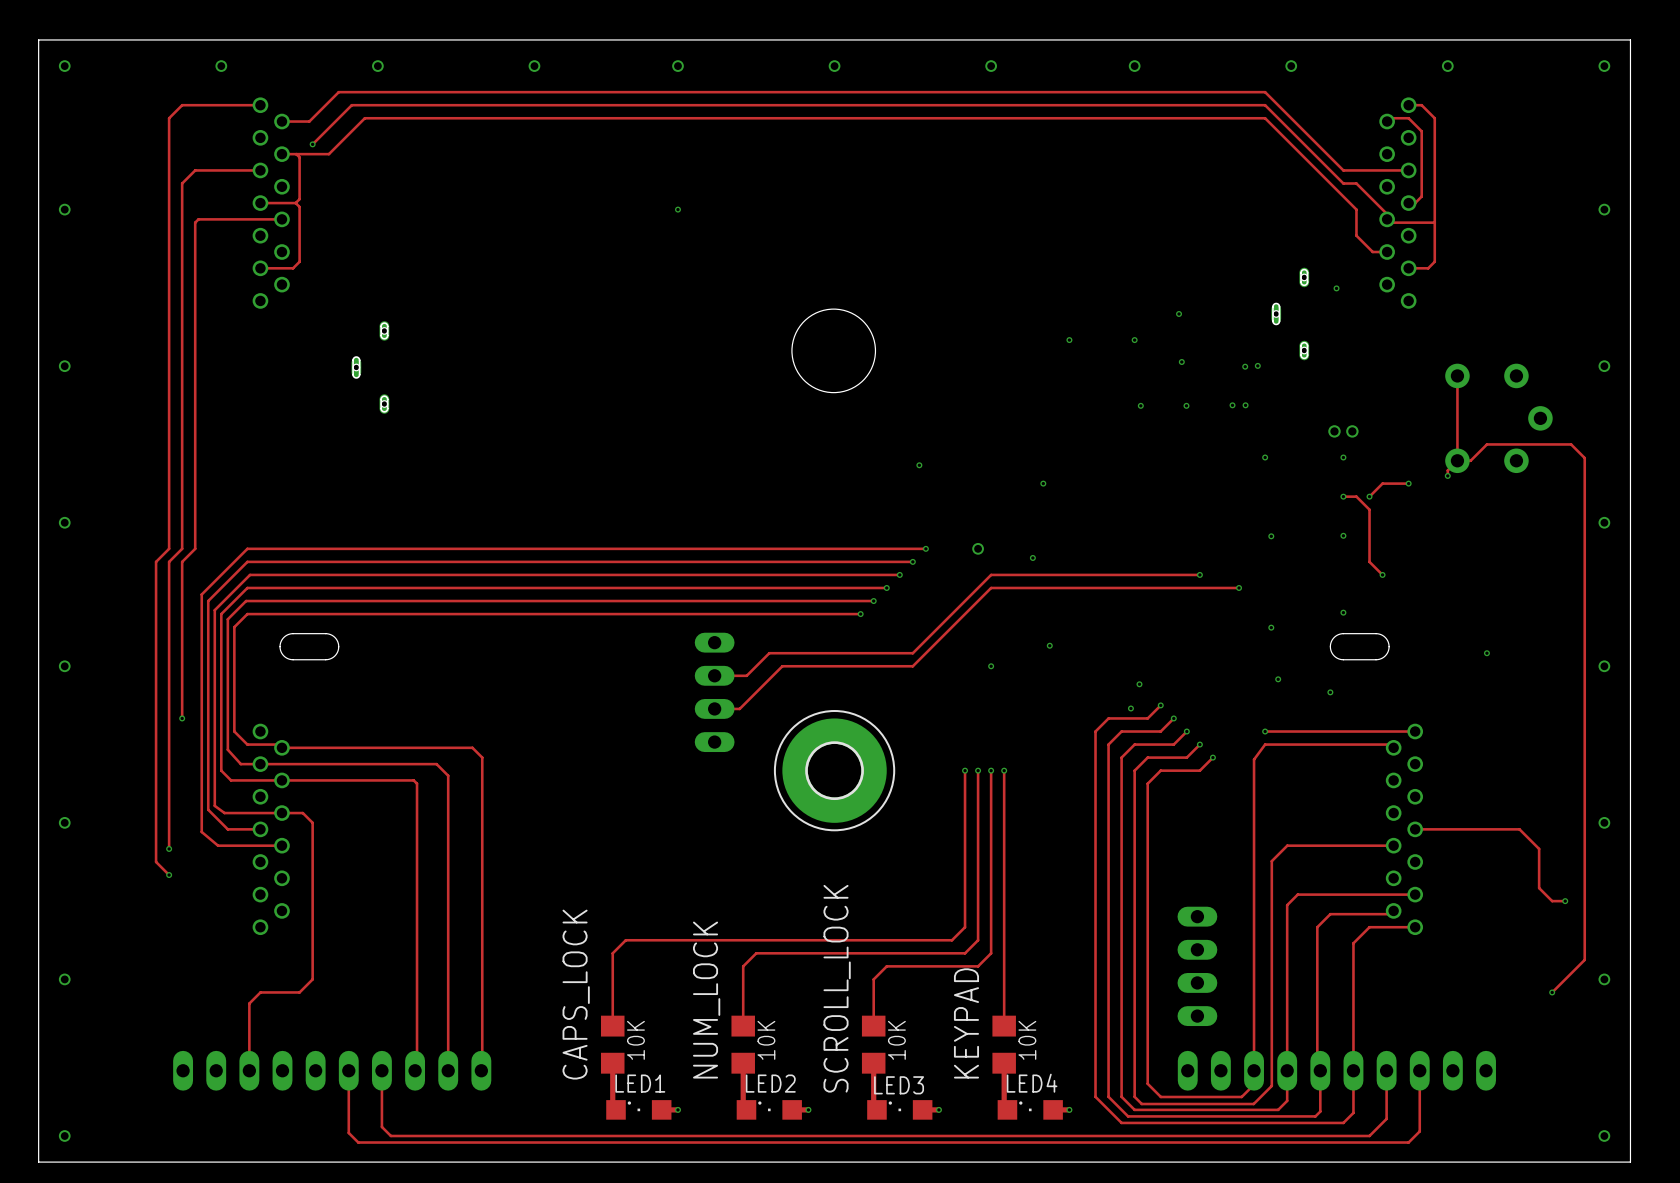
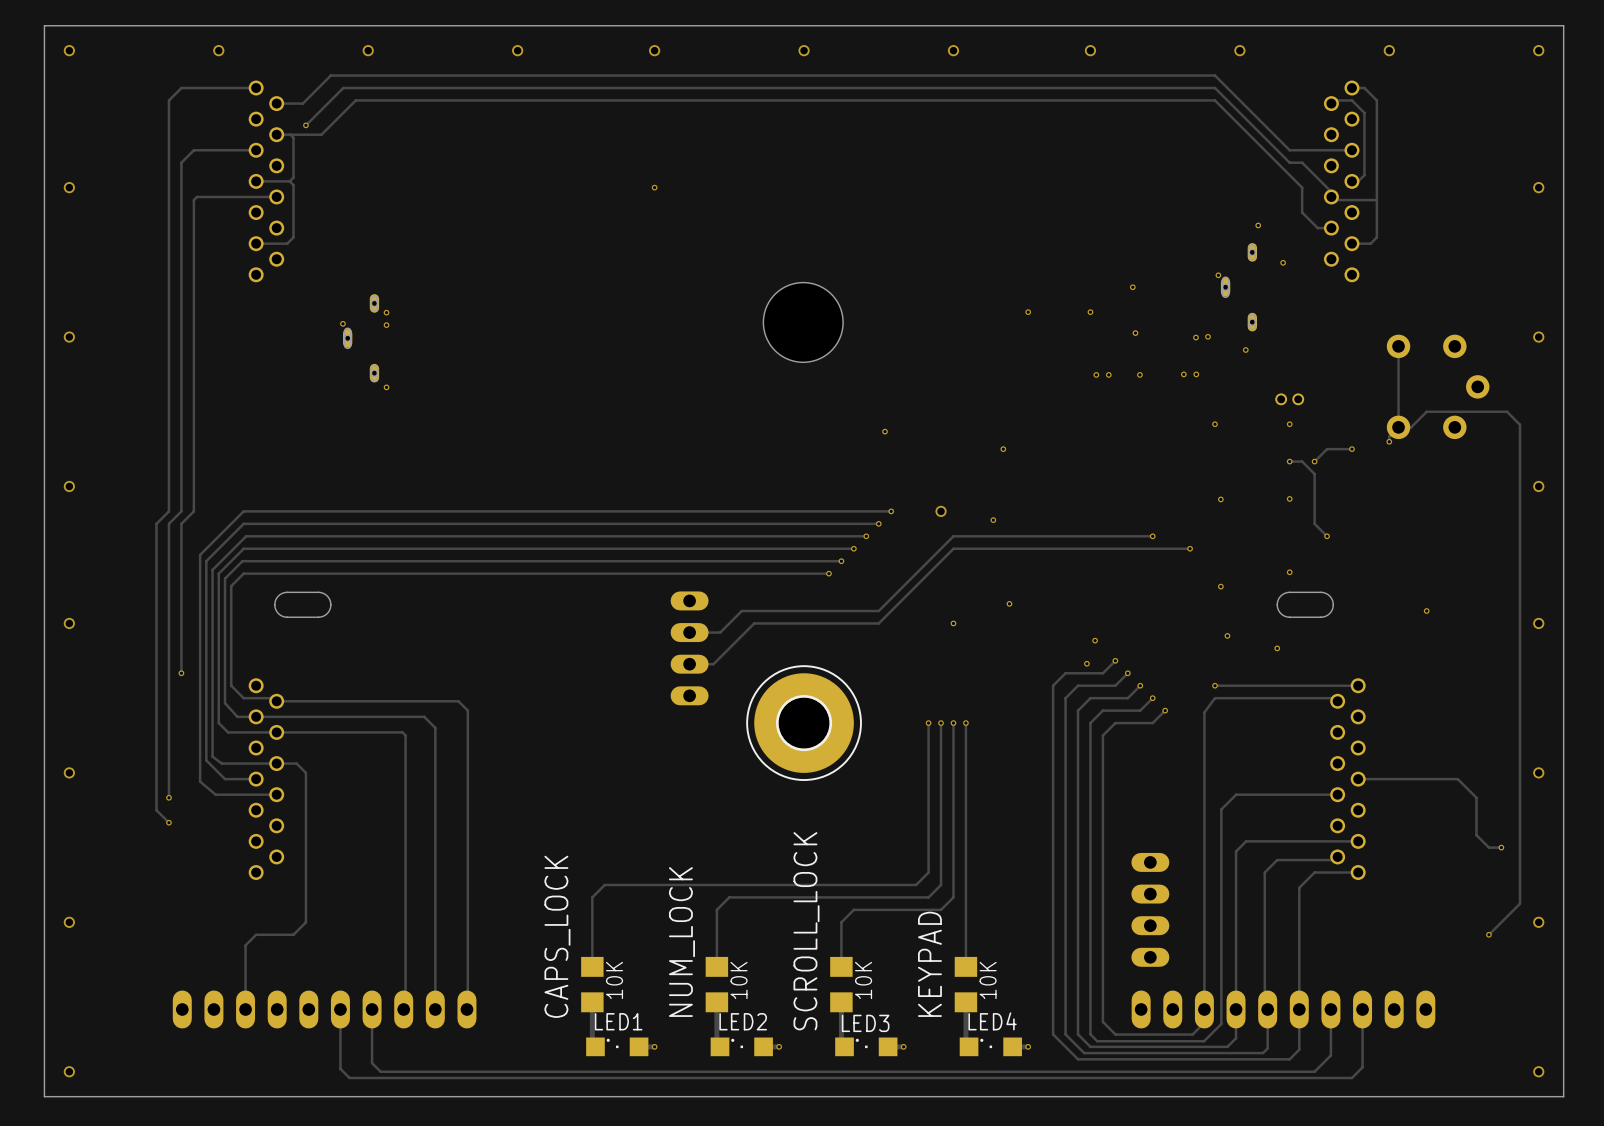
via: none -> (1258, 225)
via: none -> (1218, 275)
via: none -> (386, 312)
via: none -> (342, 323)
via: none -> (386, 325)
via: none -> (1245, 350)
via: none -> (1108, 374)
via: none -> (386, 387)

